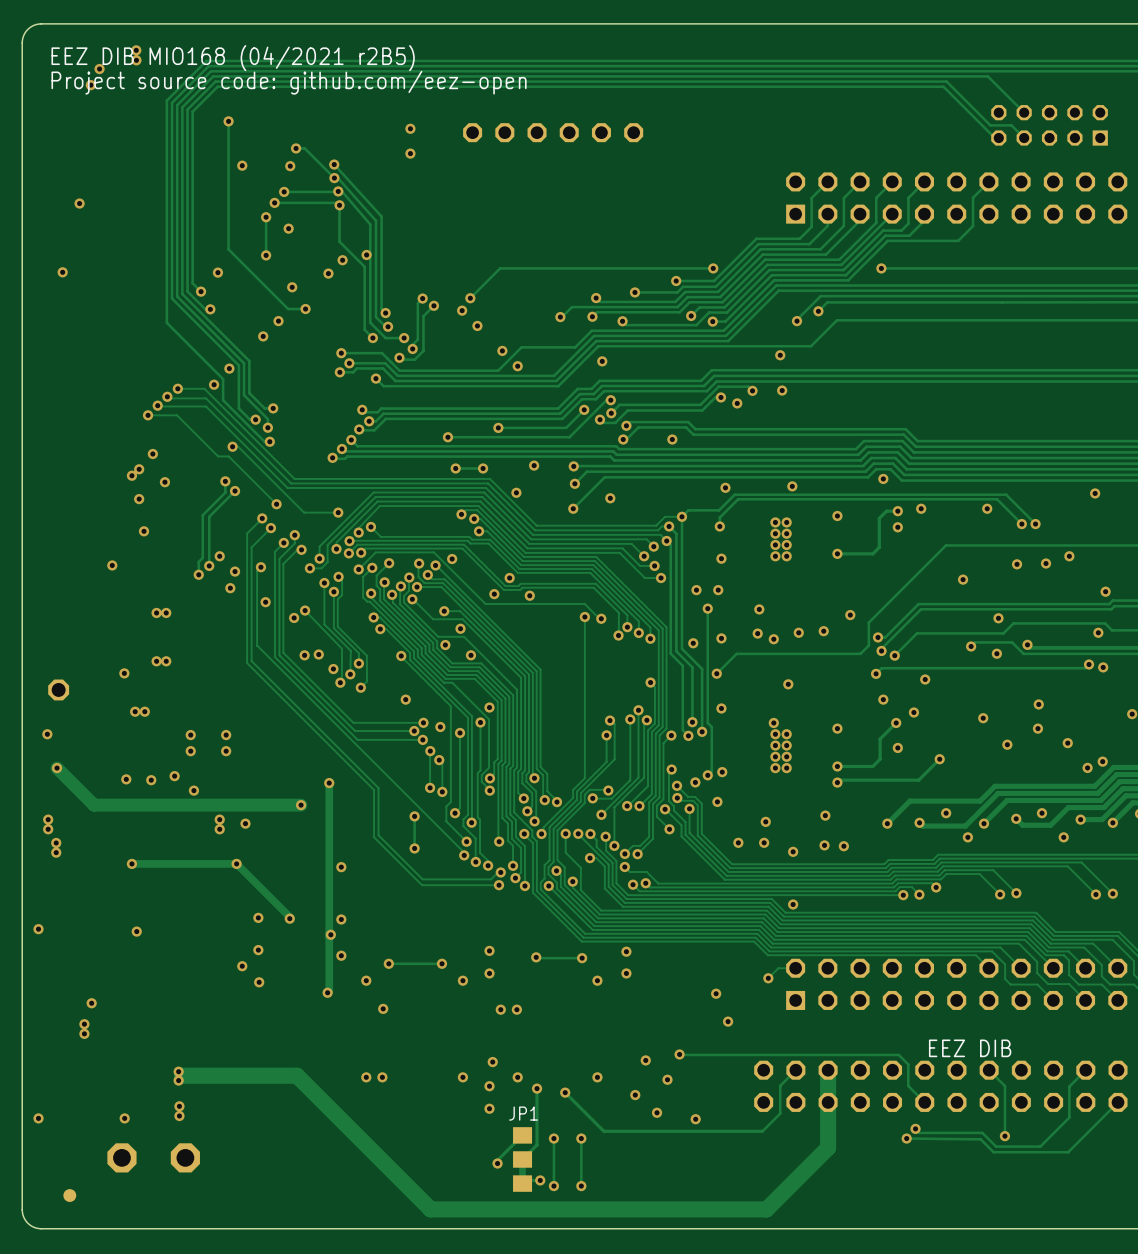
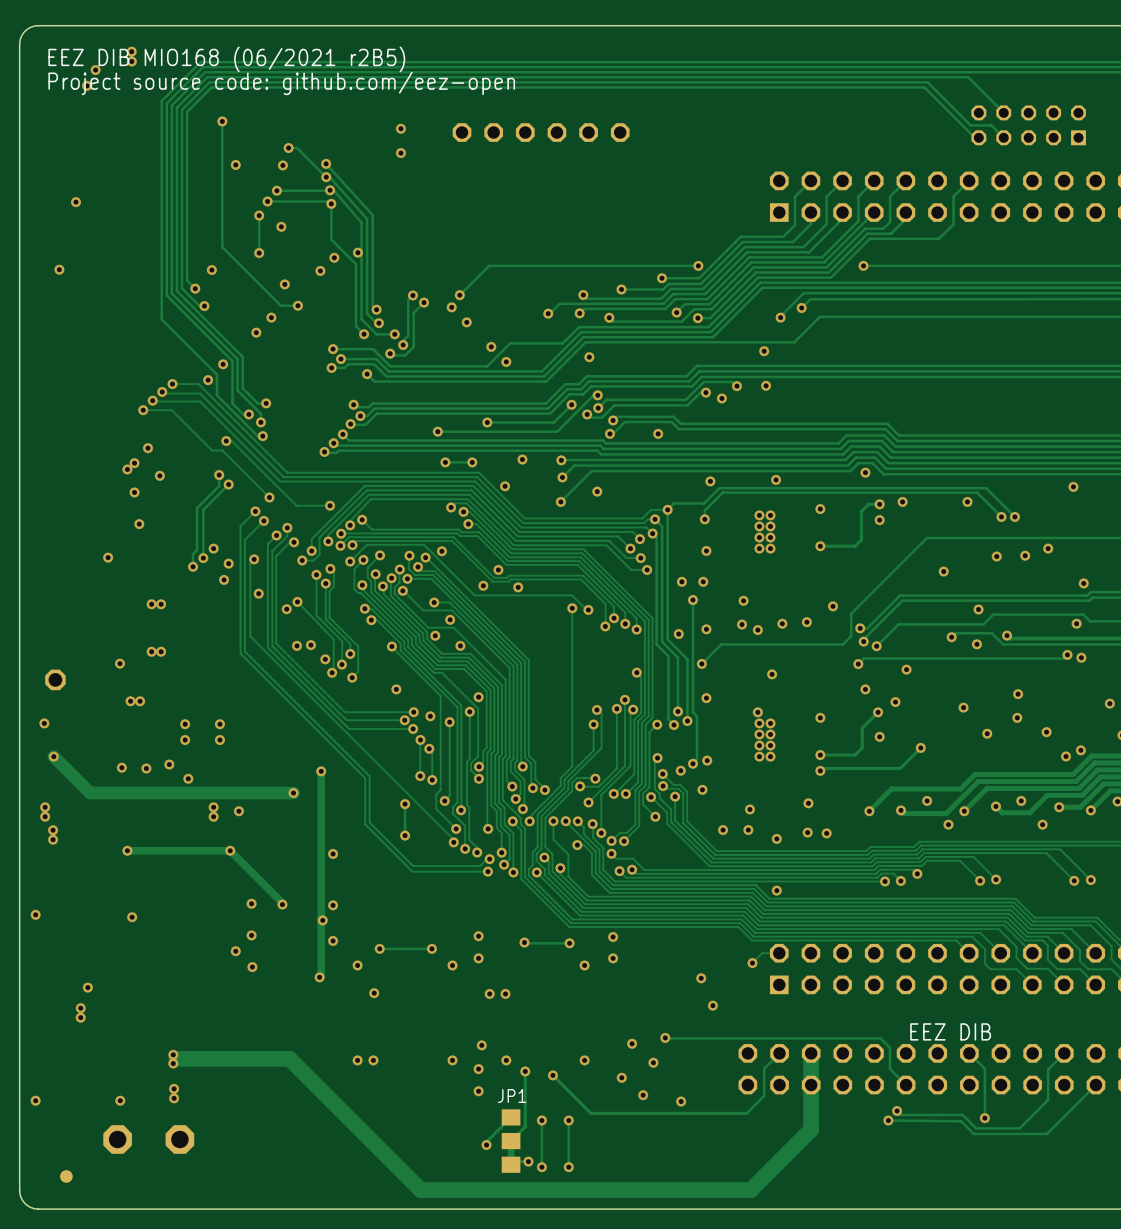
text: EEZ DIB MIO168 (04/2021 r2B5) (233, 58) -> EEZ DIB MIO168 (06/2021 r2B5) (226, 59)

